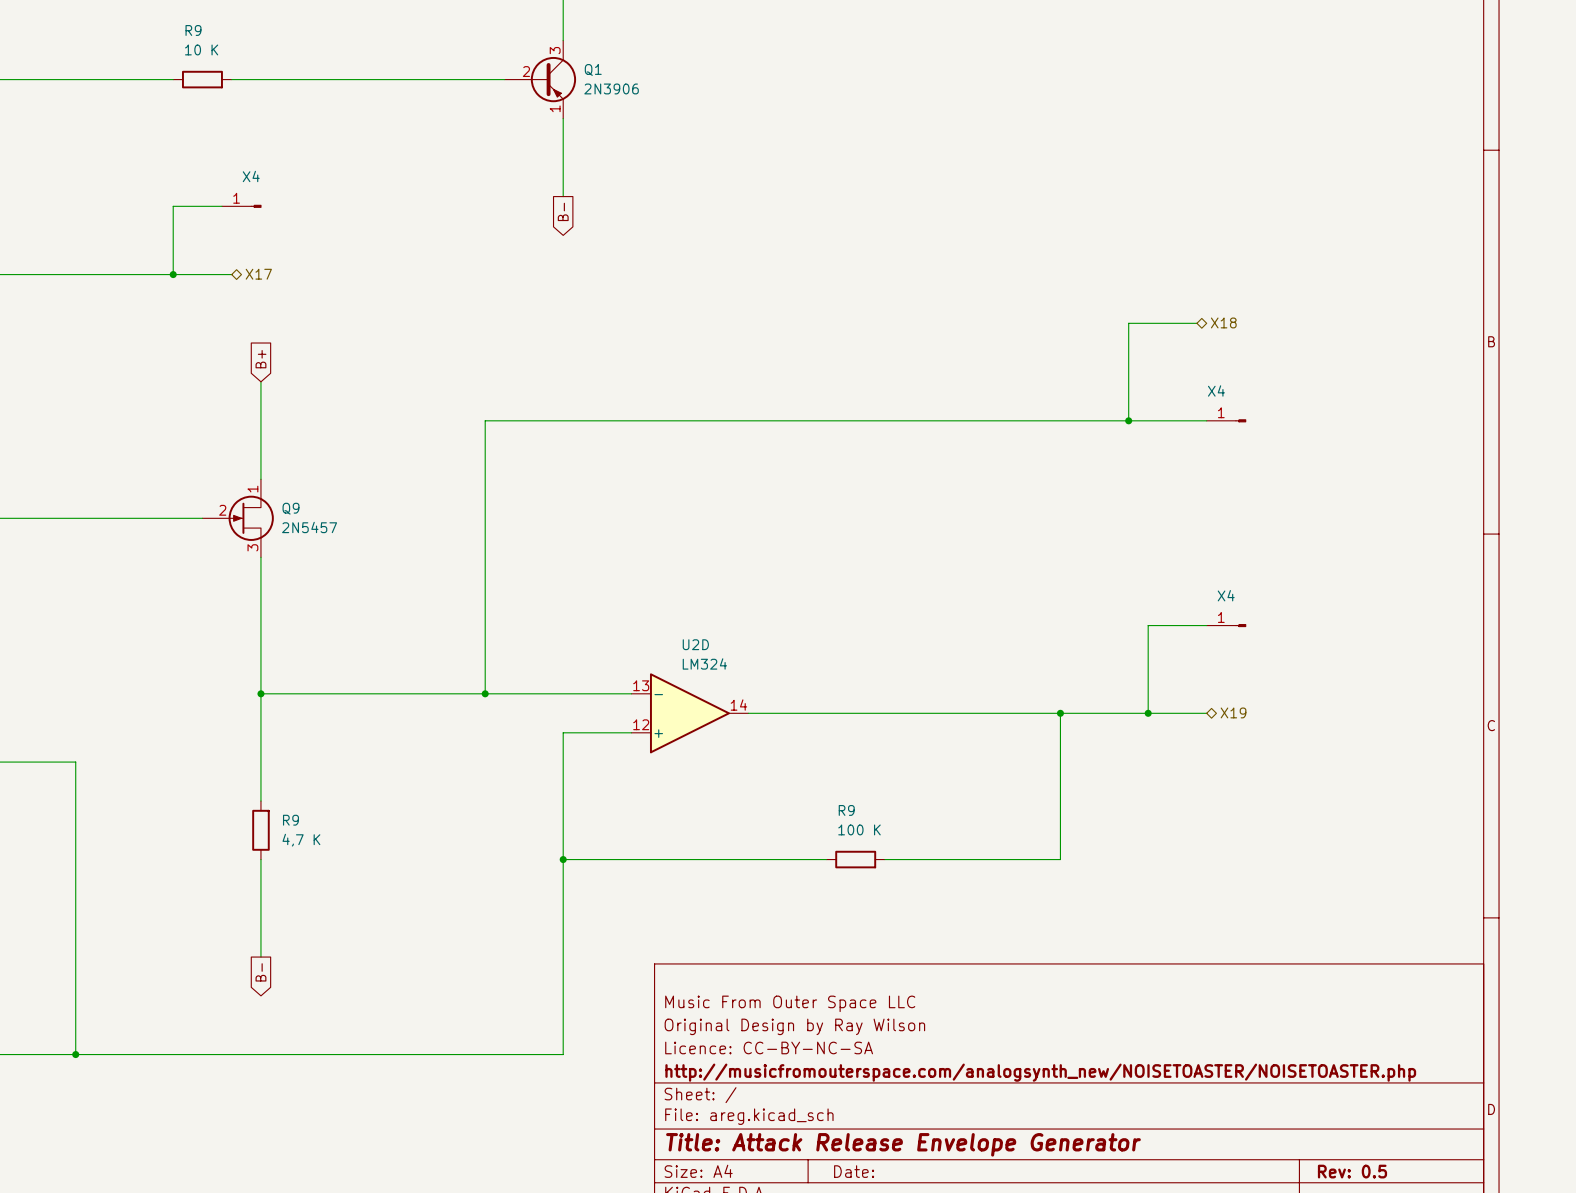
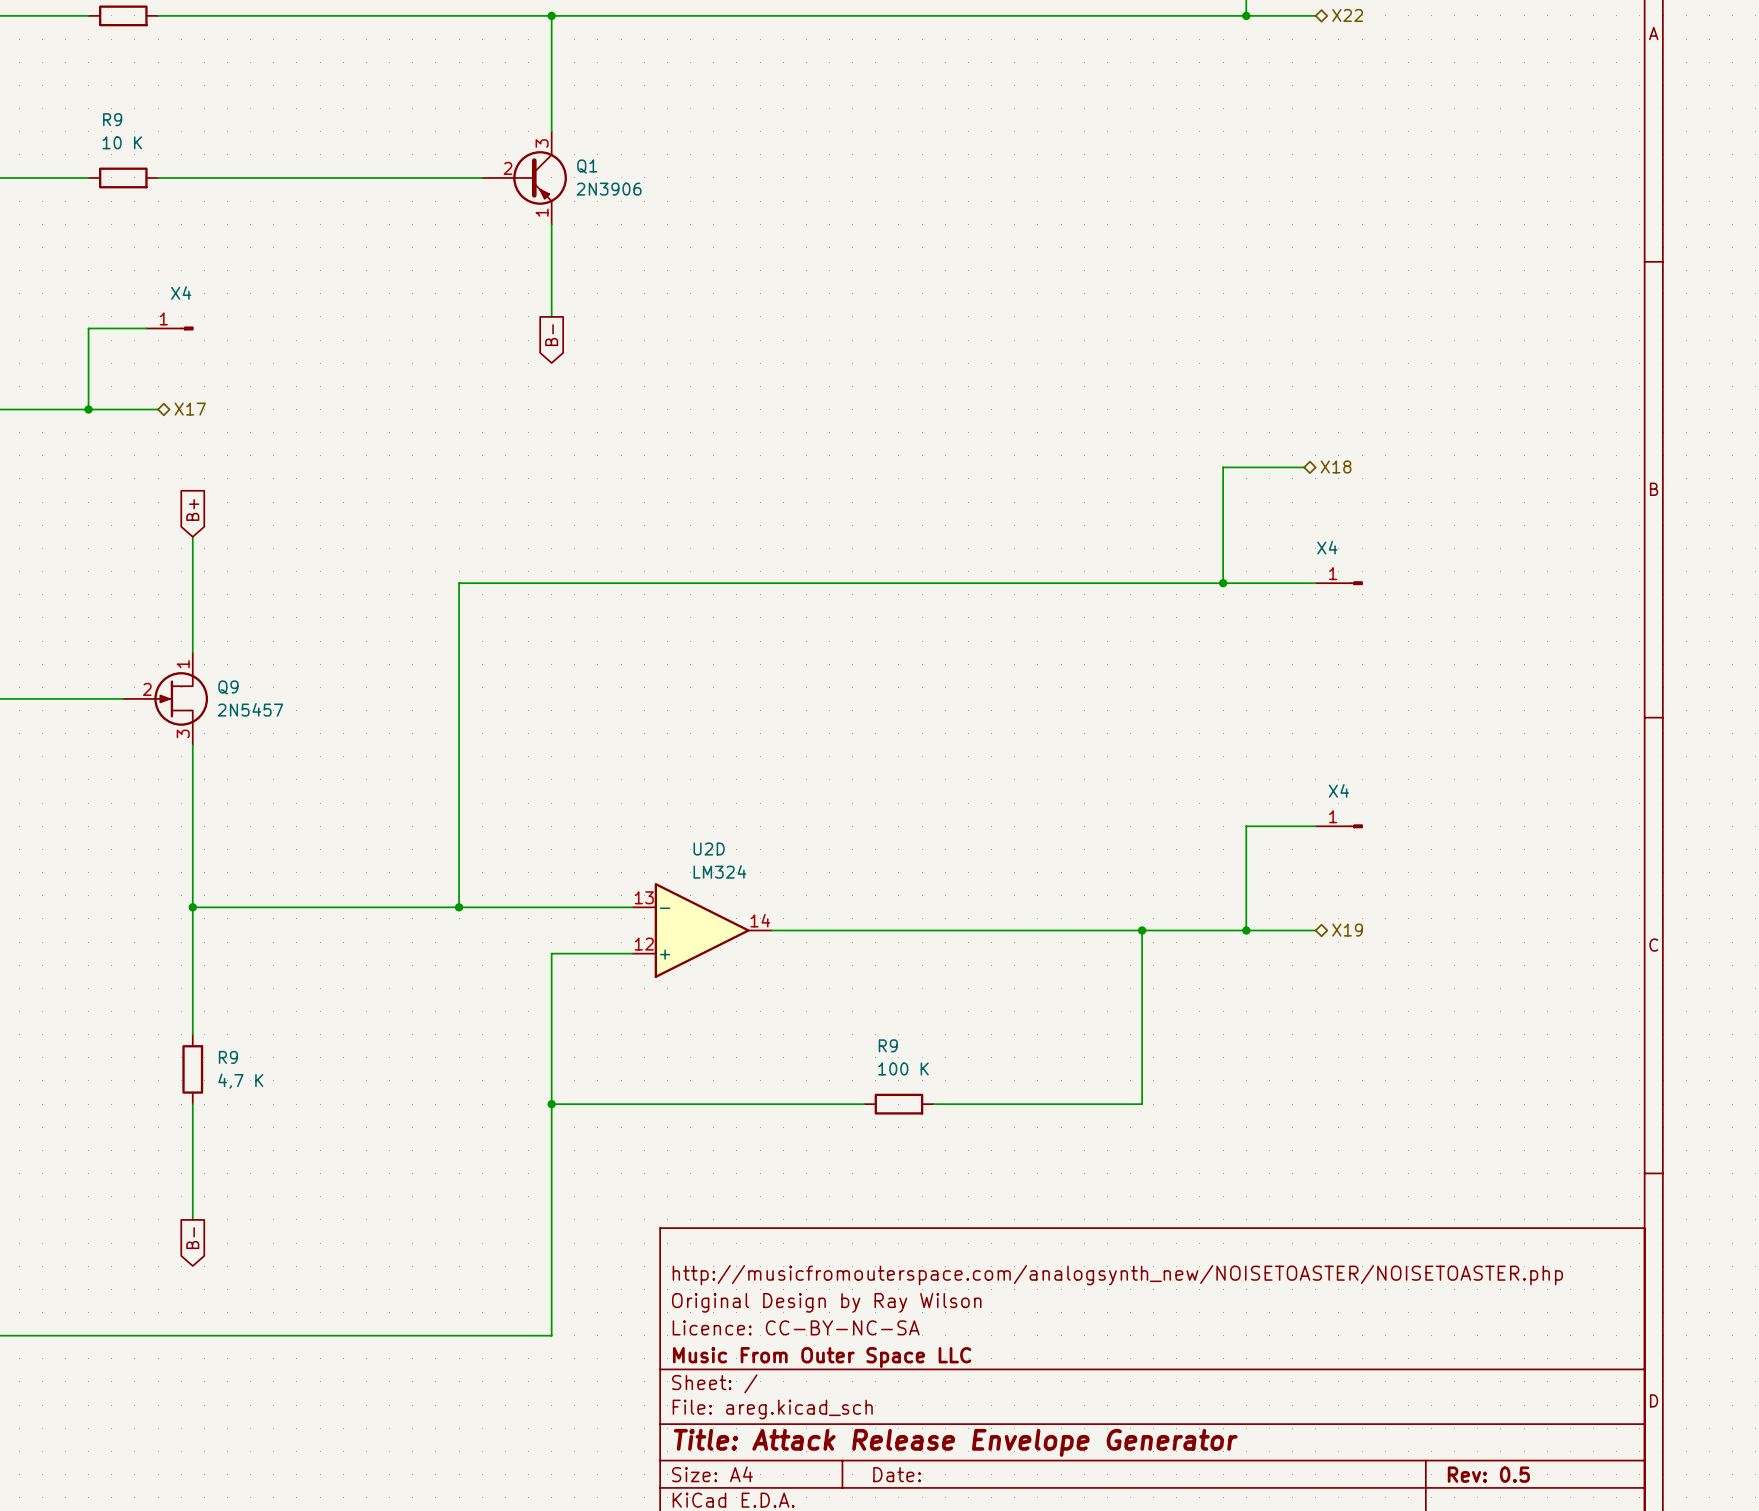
title block: Music From Outer Space LLC (790, 1003) -> http://musicfromouterspace.com/analogsynth_new/NOISETOASTER/NOISETOASTER.php (1117, 1275)
title block: http://musicfromouterspace.com/analogsynth_new/NOISETOASTER/NOISETOASTER.php (1040, 1072) -> Music From Outer Space LLC (822, 1357)

